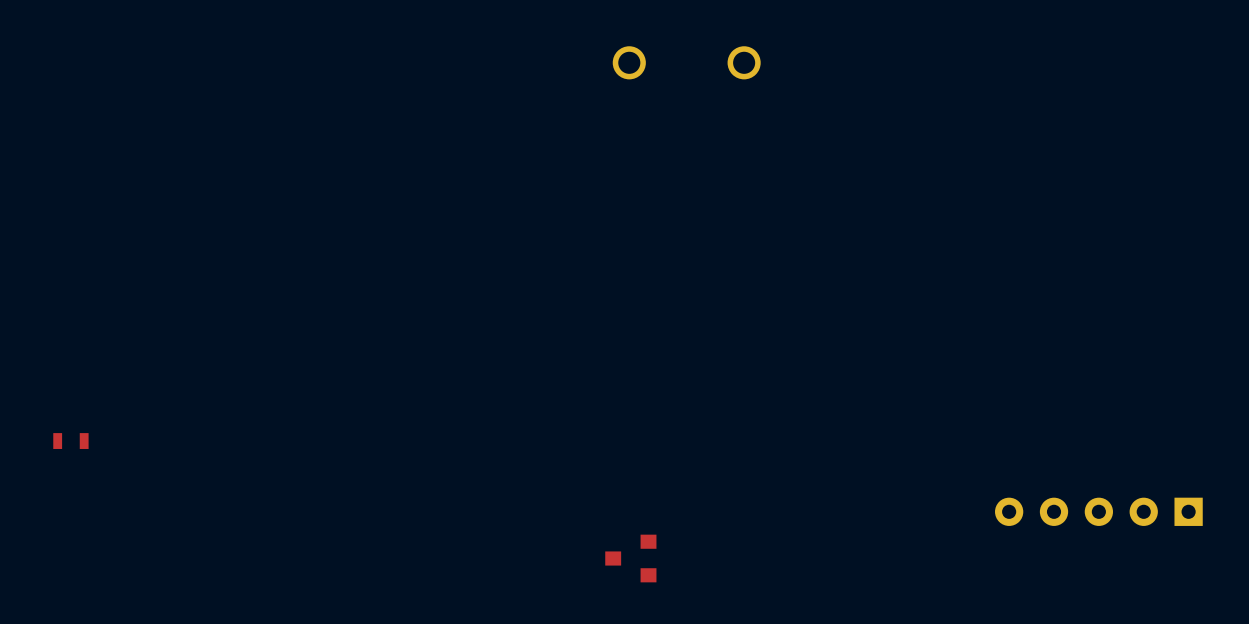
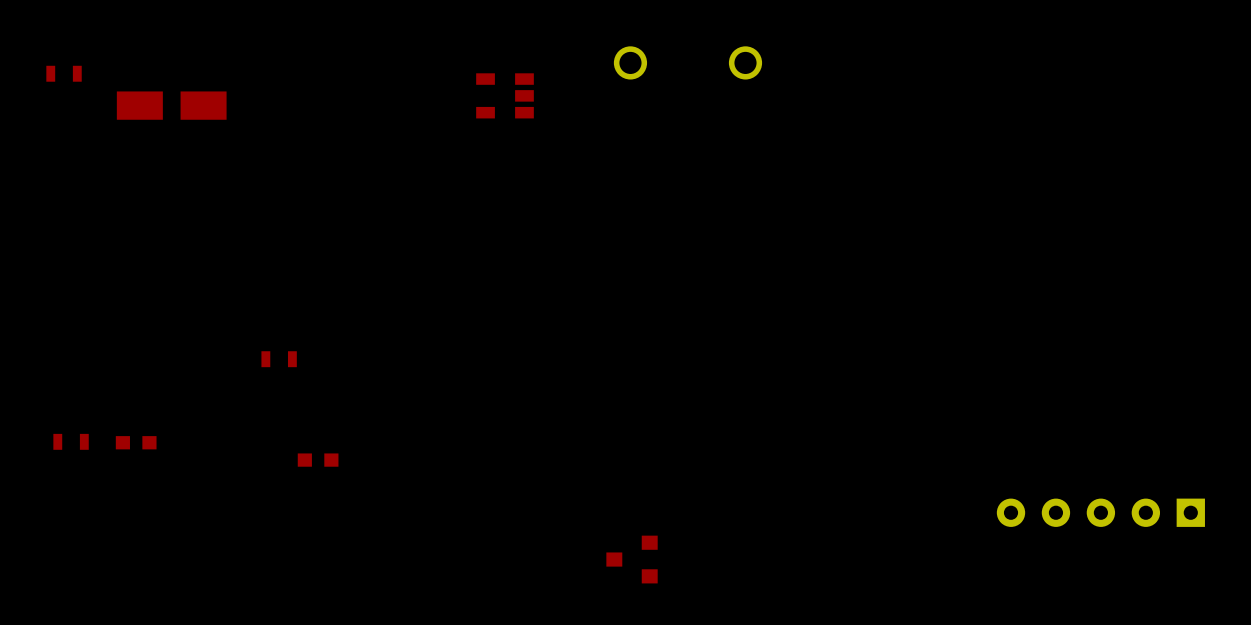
part: none -> (64, 73)
part: none -> (505, 95)
part: none -> (171, 105)
part: none -> (279, 359)
part: none -> (136, 442)
part: none -> (318, 460)

